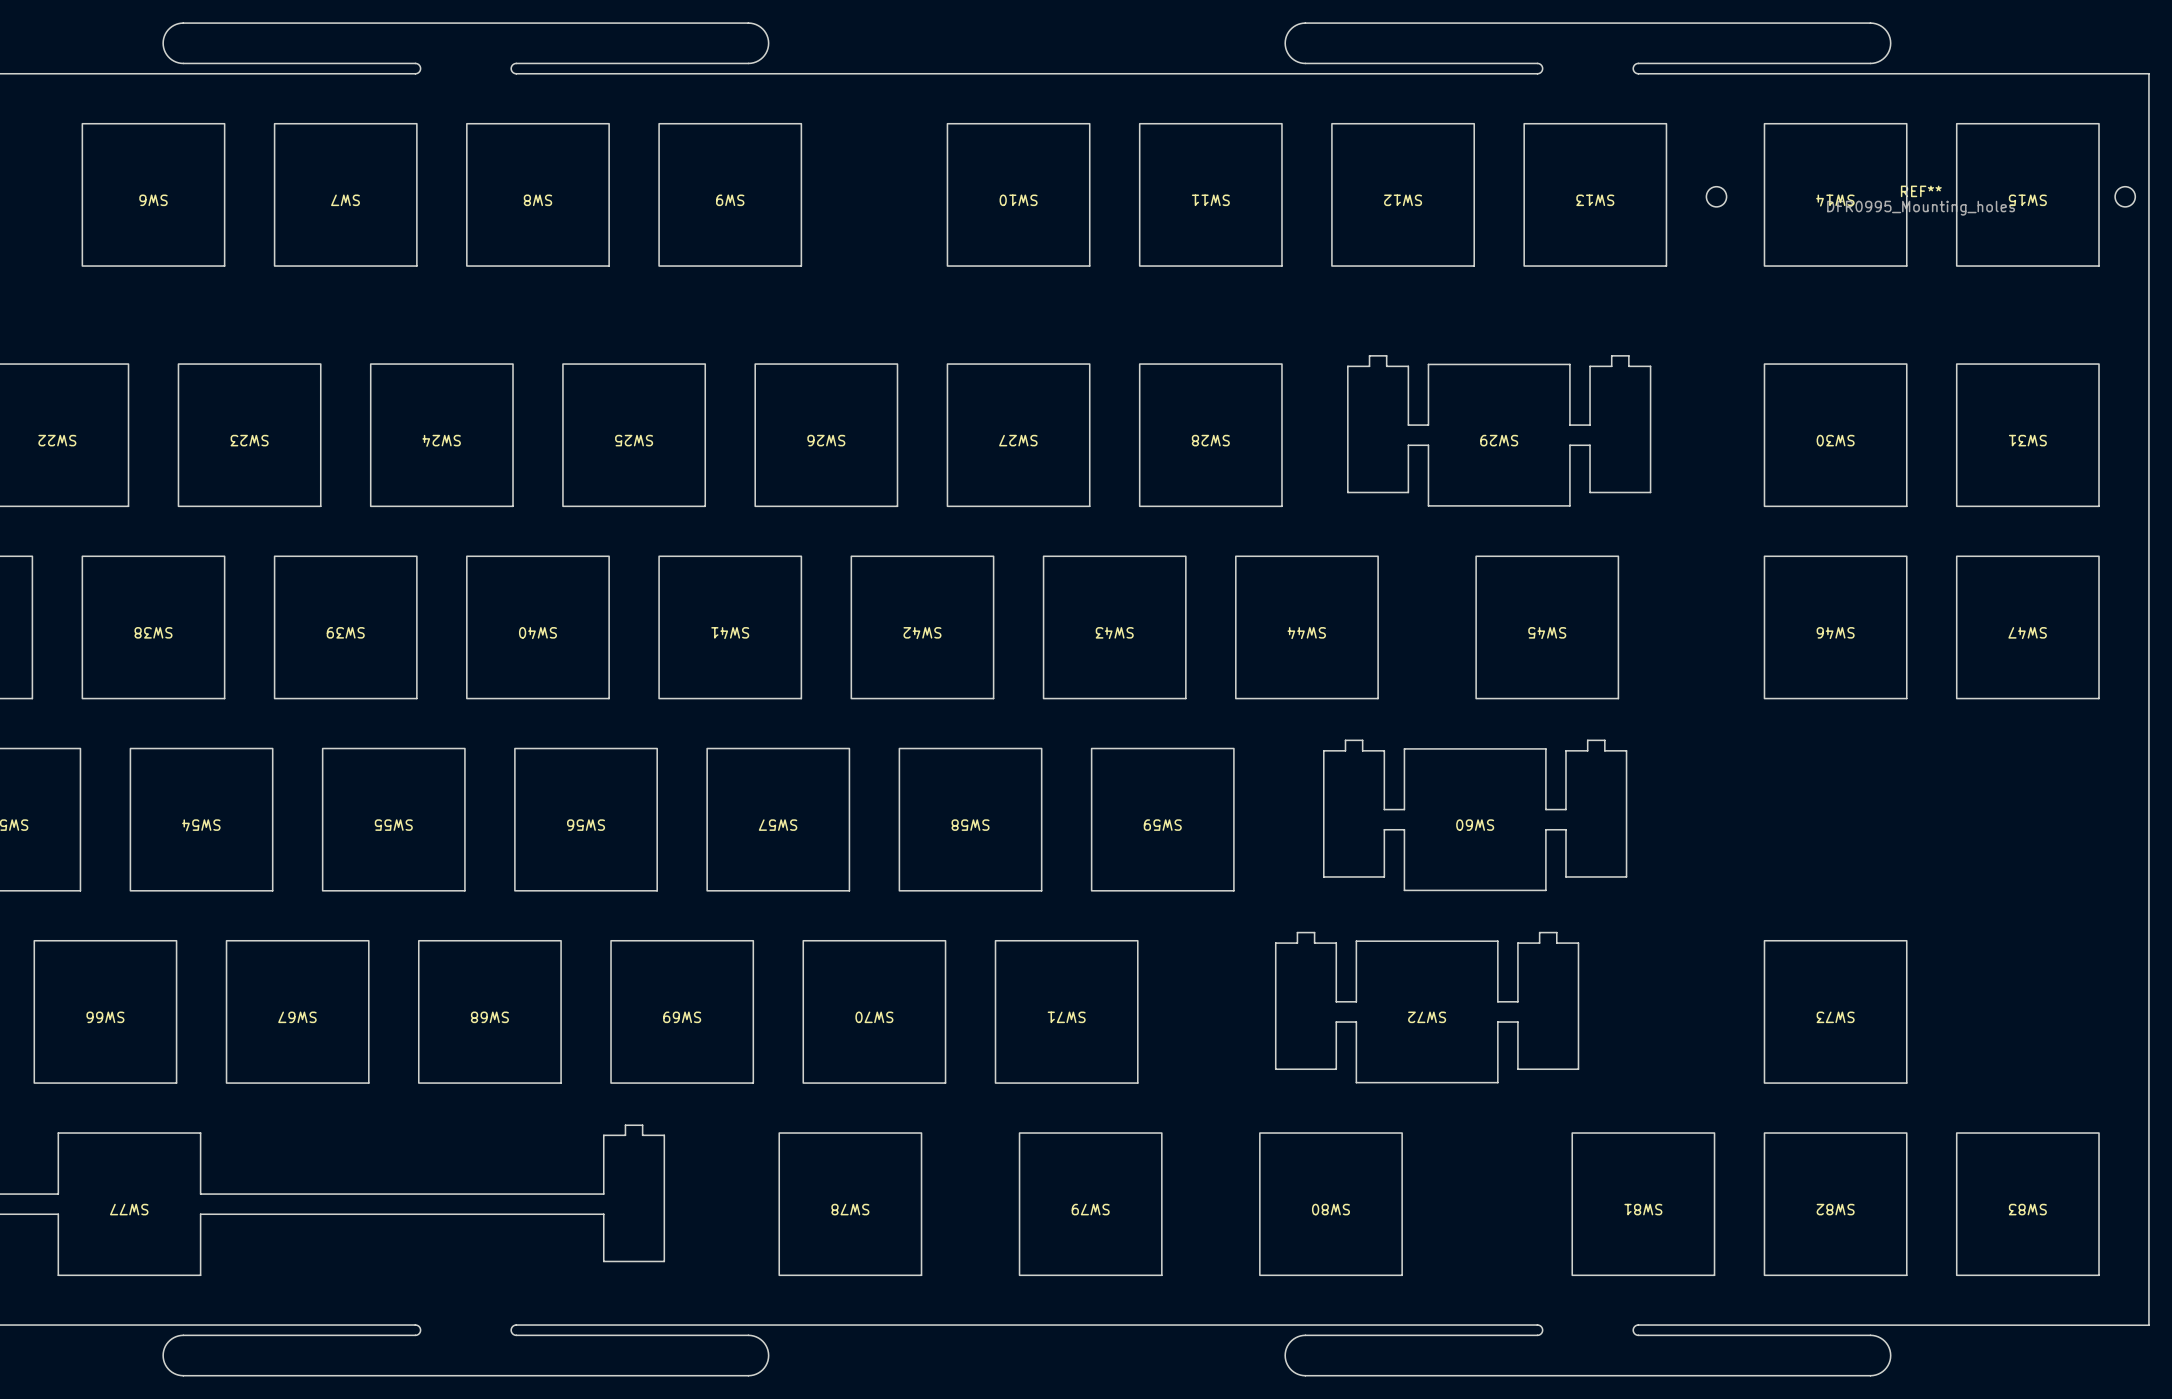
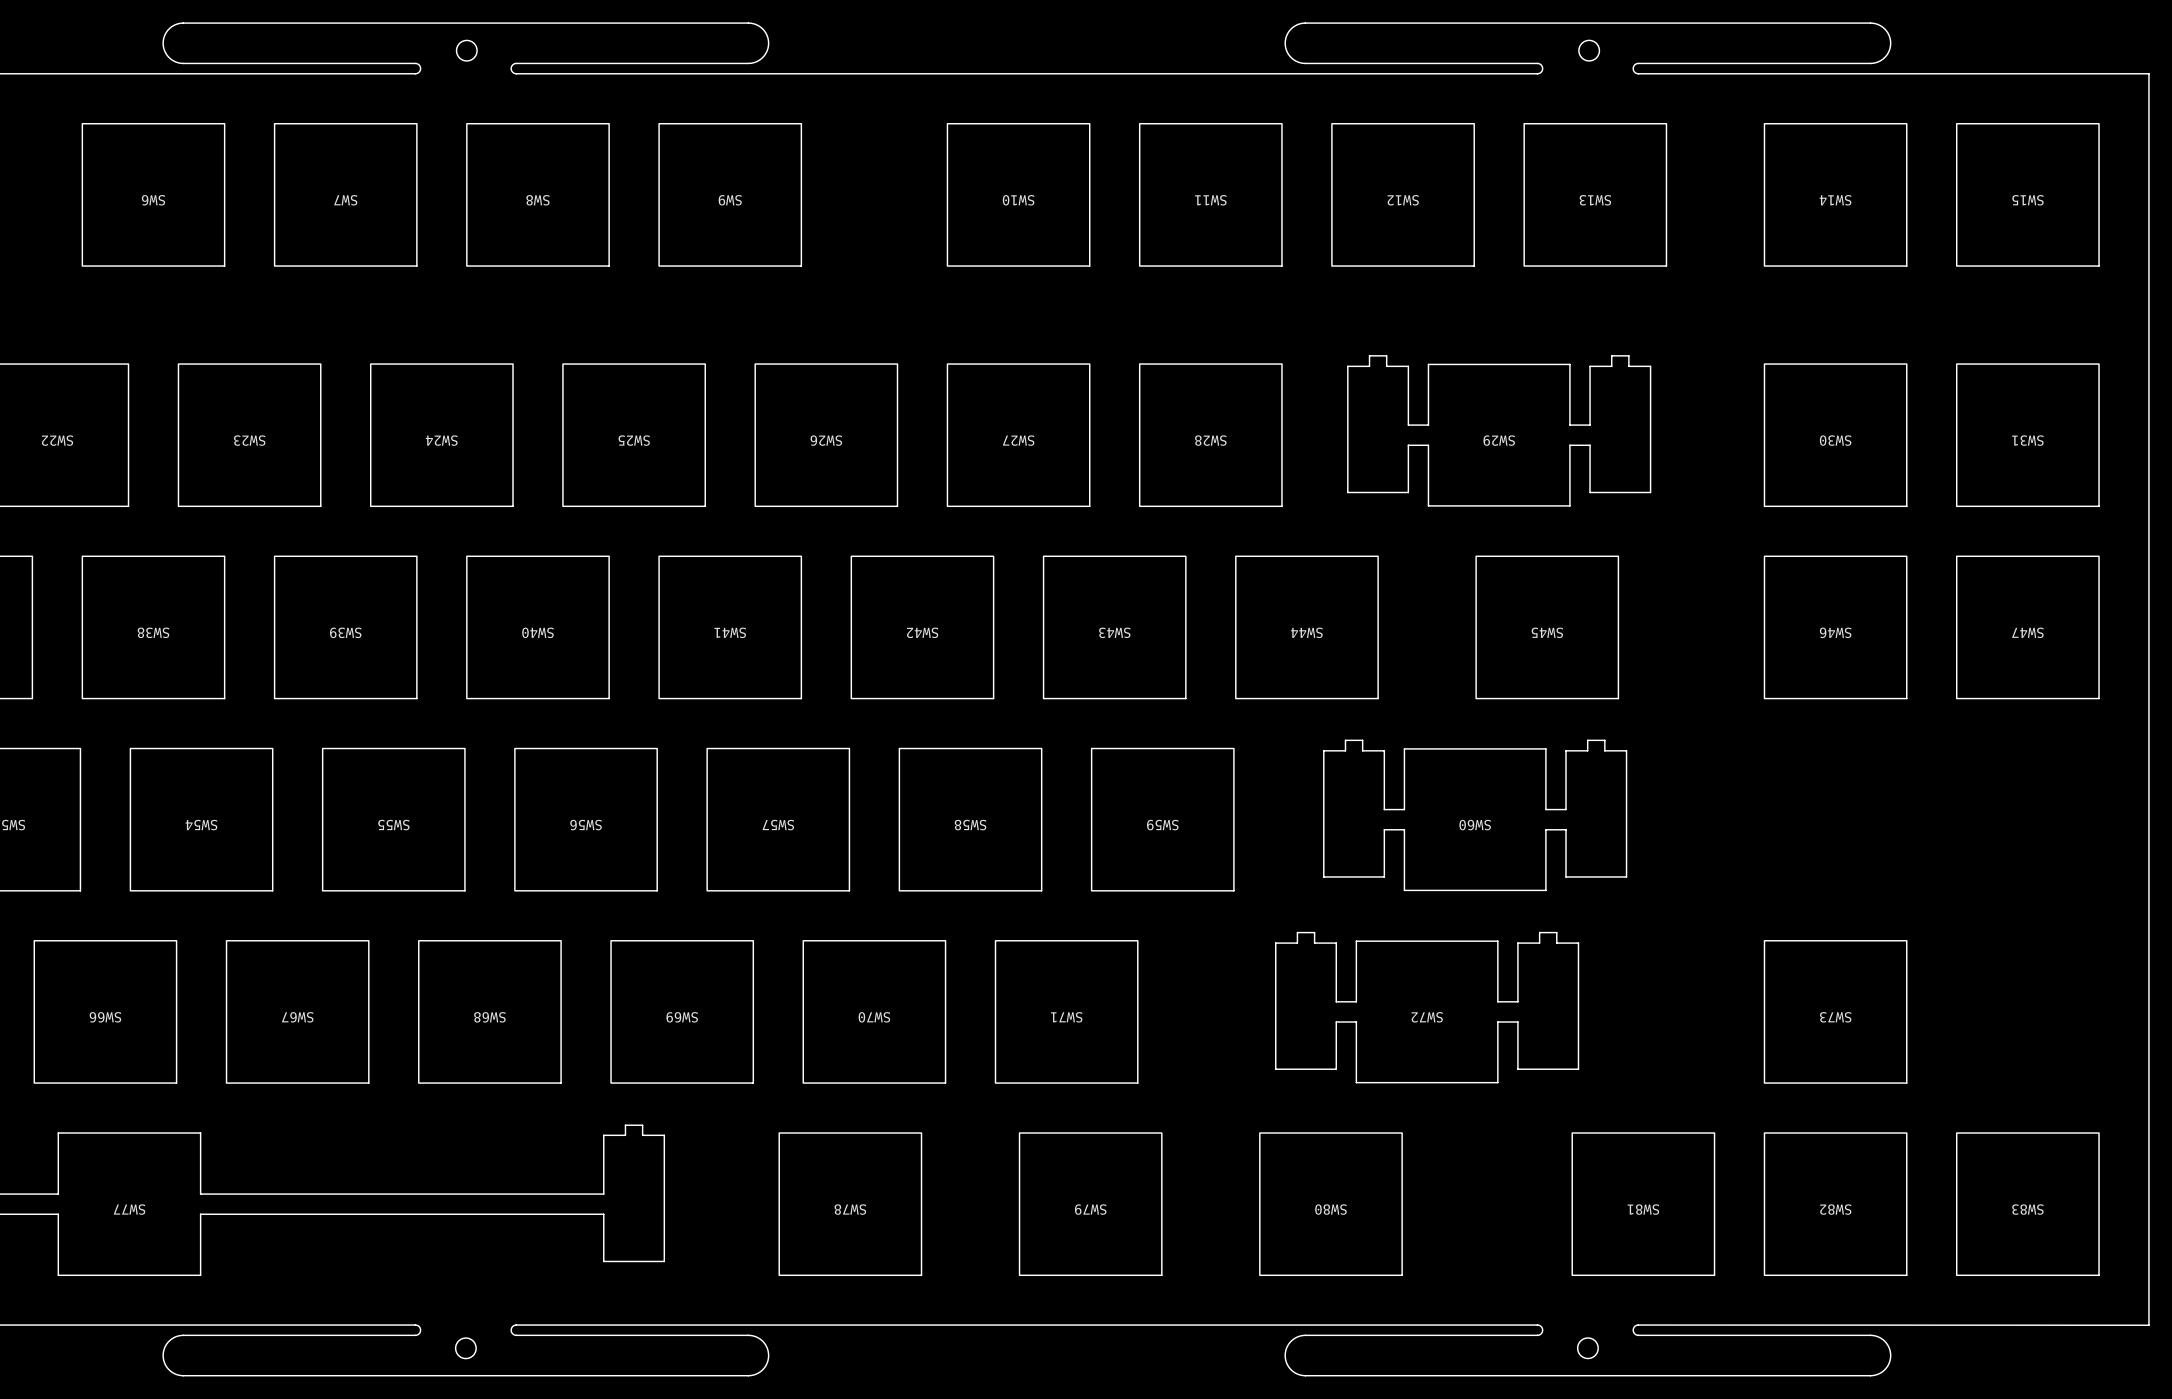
round board edge: none -> [456, 40, 478, 62]
round board edge: none -> [1578, 40, 1600, 62]
REF**: DFR0995_Mounting_holes (1920, 196) -> none
round board edge: none -> [455, 1337, 477, 1359]
round board edge: none -> [1577, 1337, 1599, 1359]

